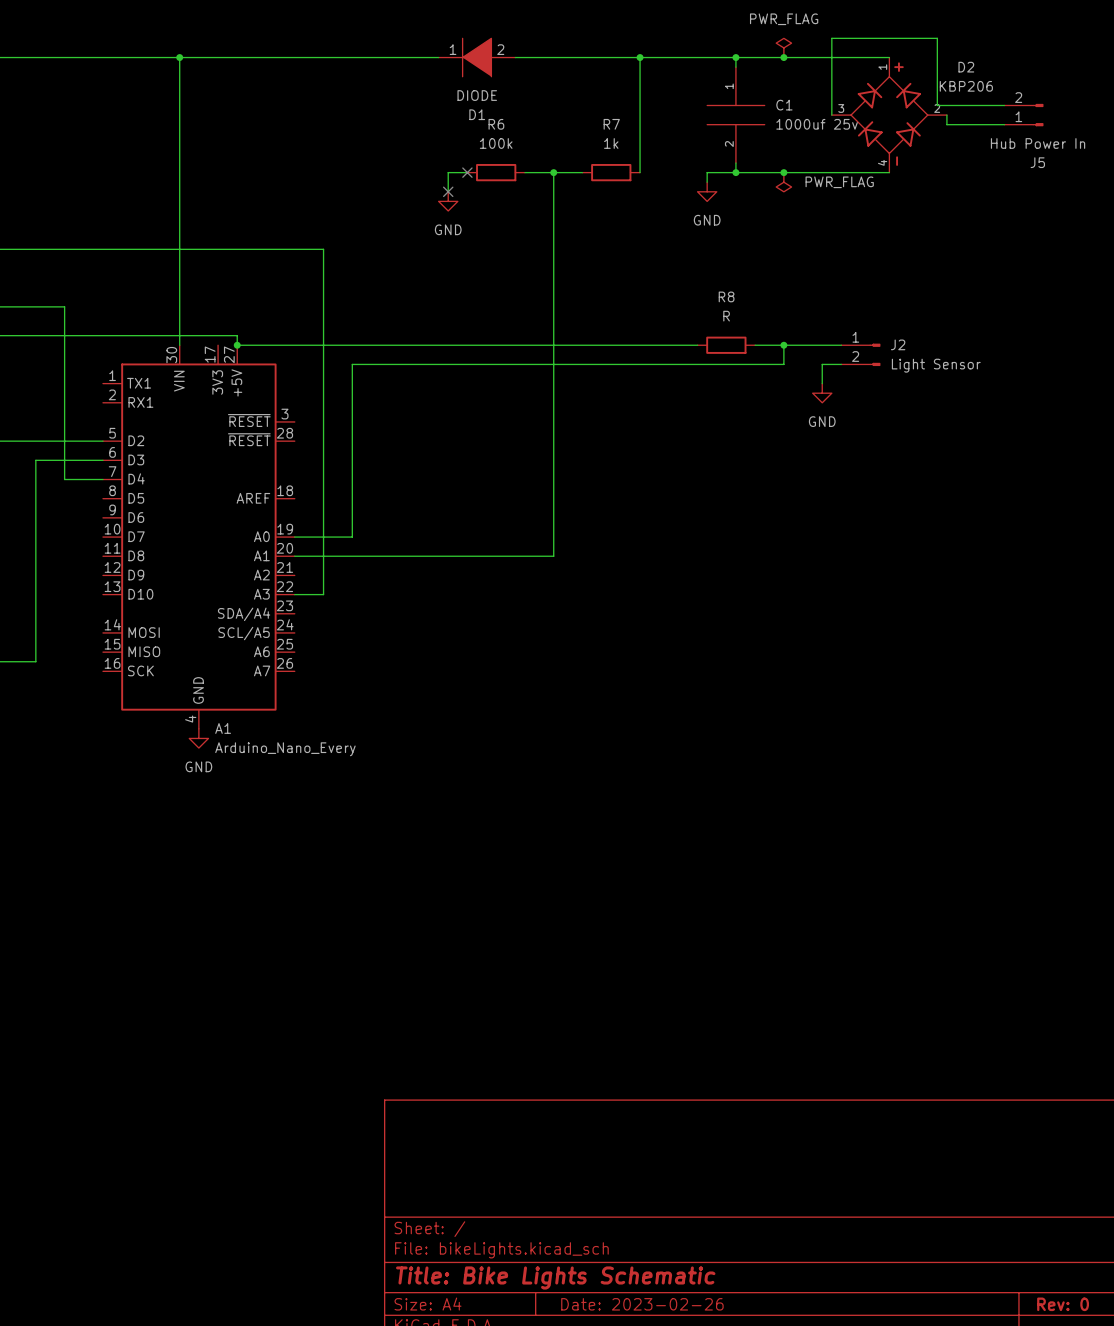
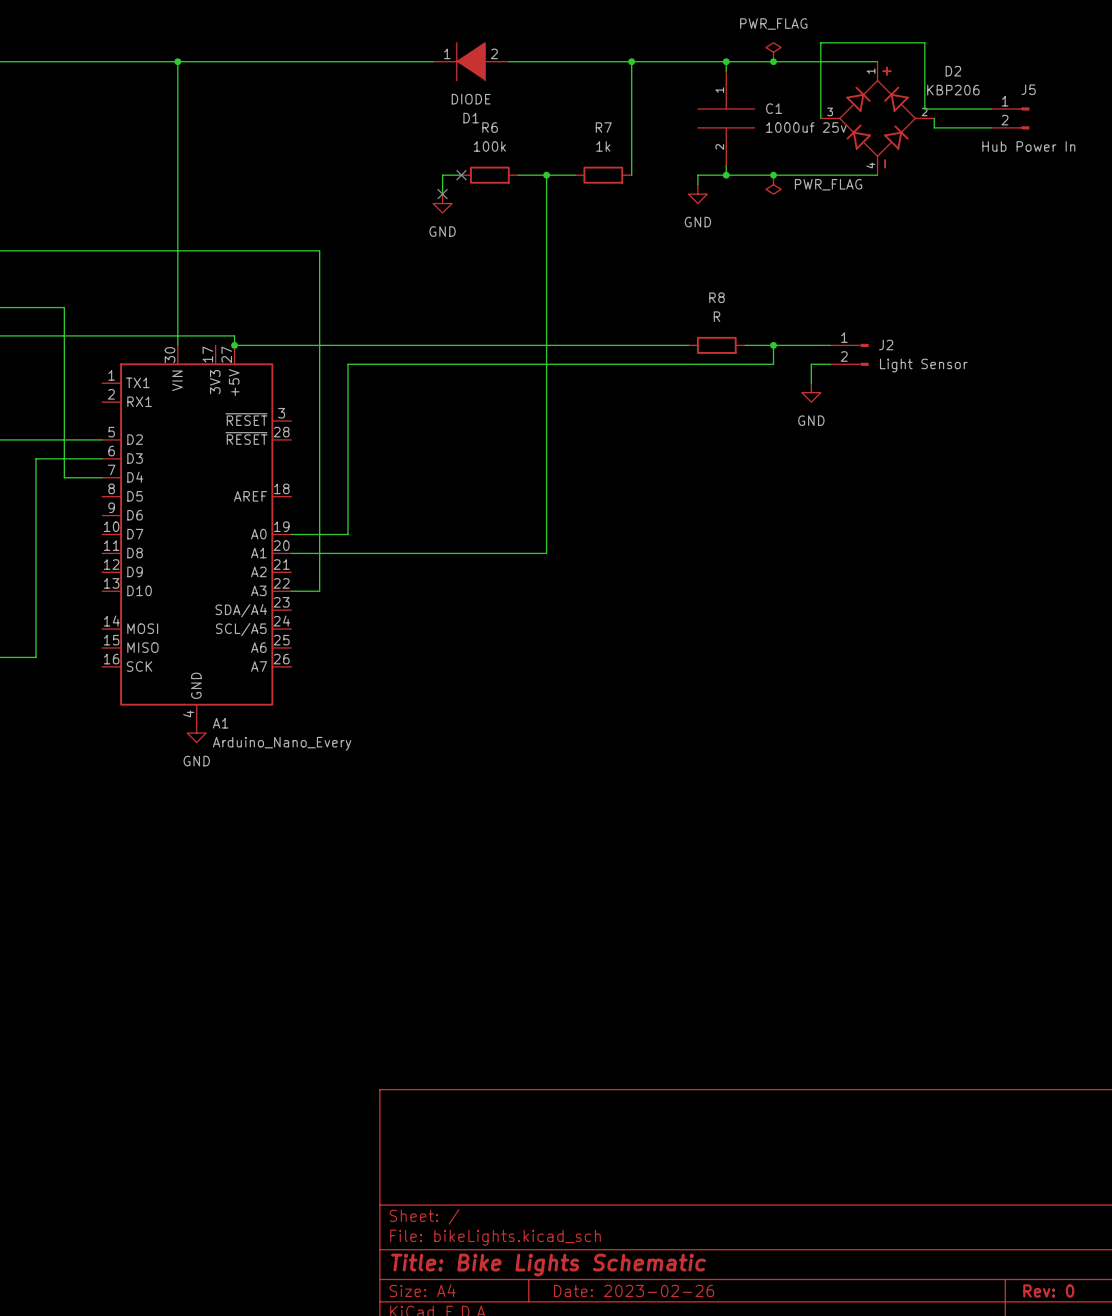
J5 flip: as is (1038, 115) -> up-down (1024, 118)
J5 name position: J5 (1037, 162) -> J5 (1028, 89)

